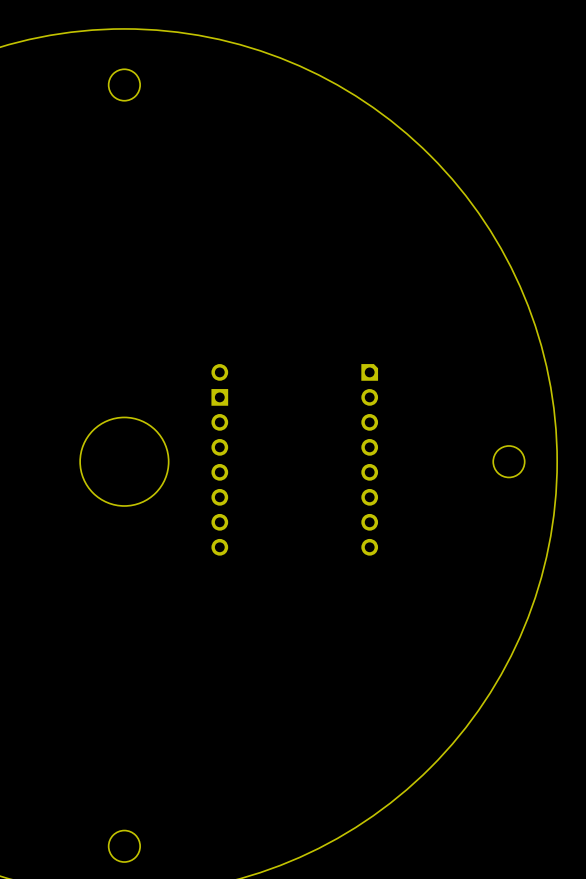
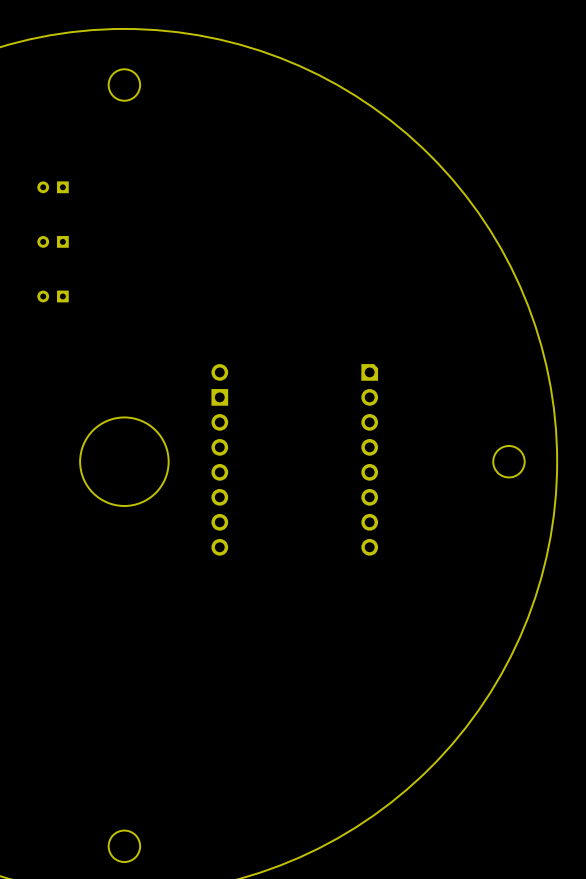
part: none -> (53, 187)
part: none -> (53, 241)
part: none -> (53, 296)

